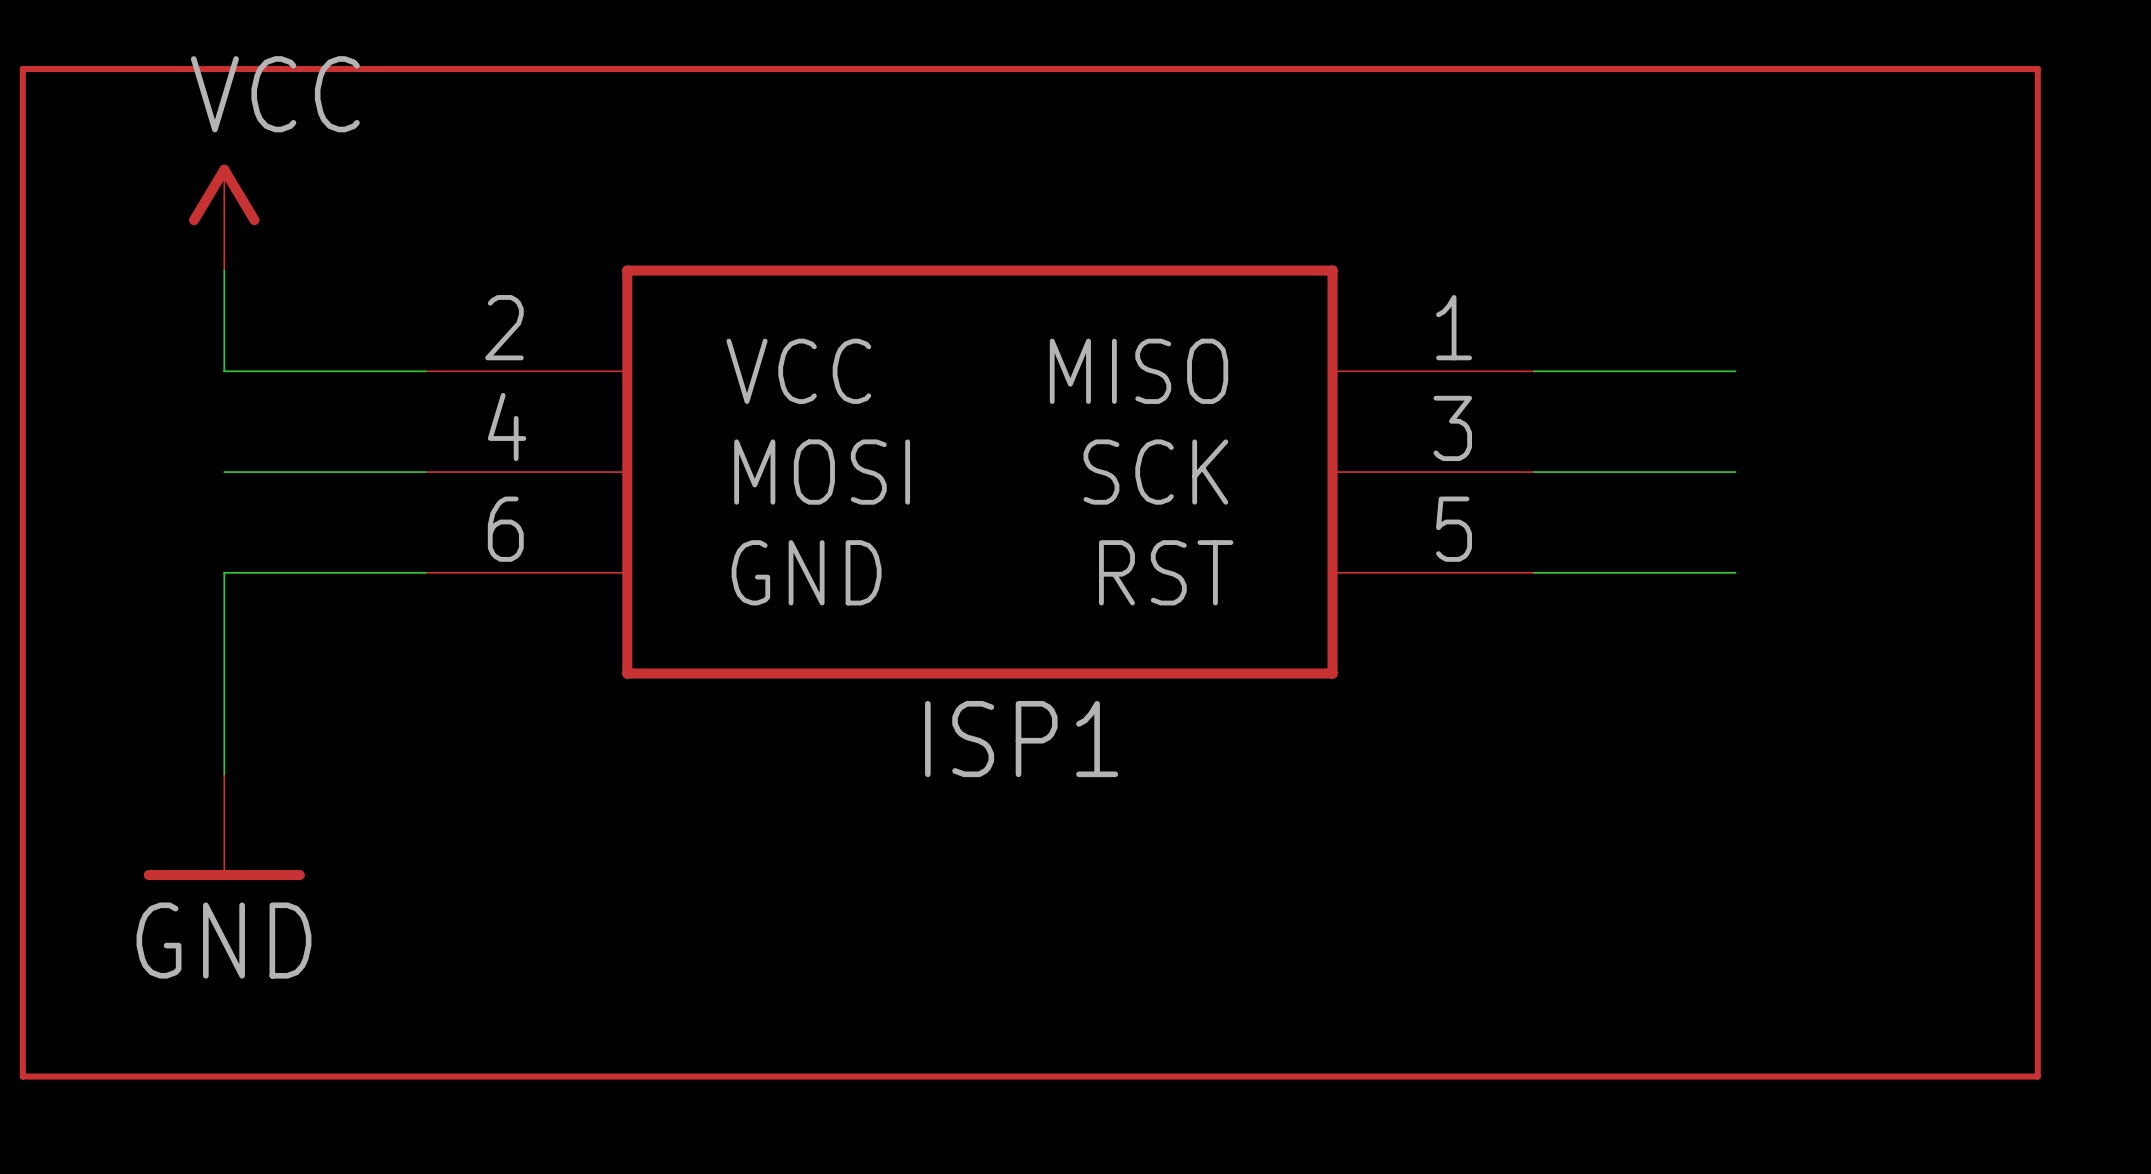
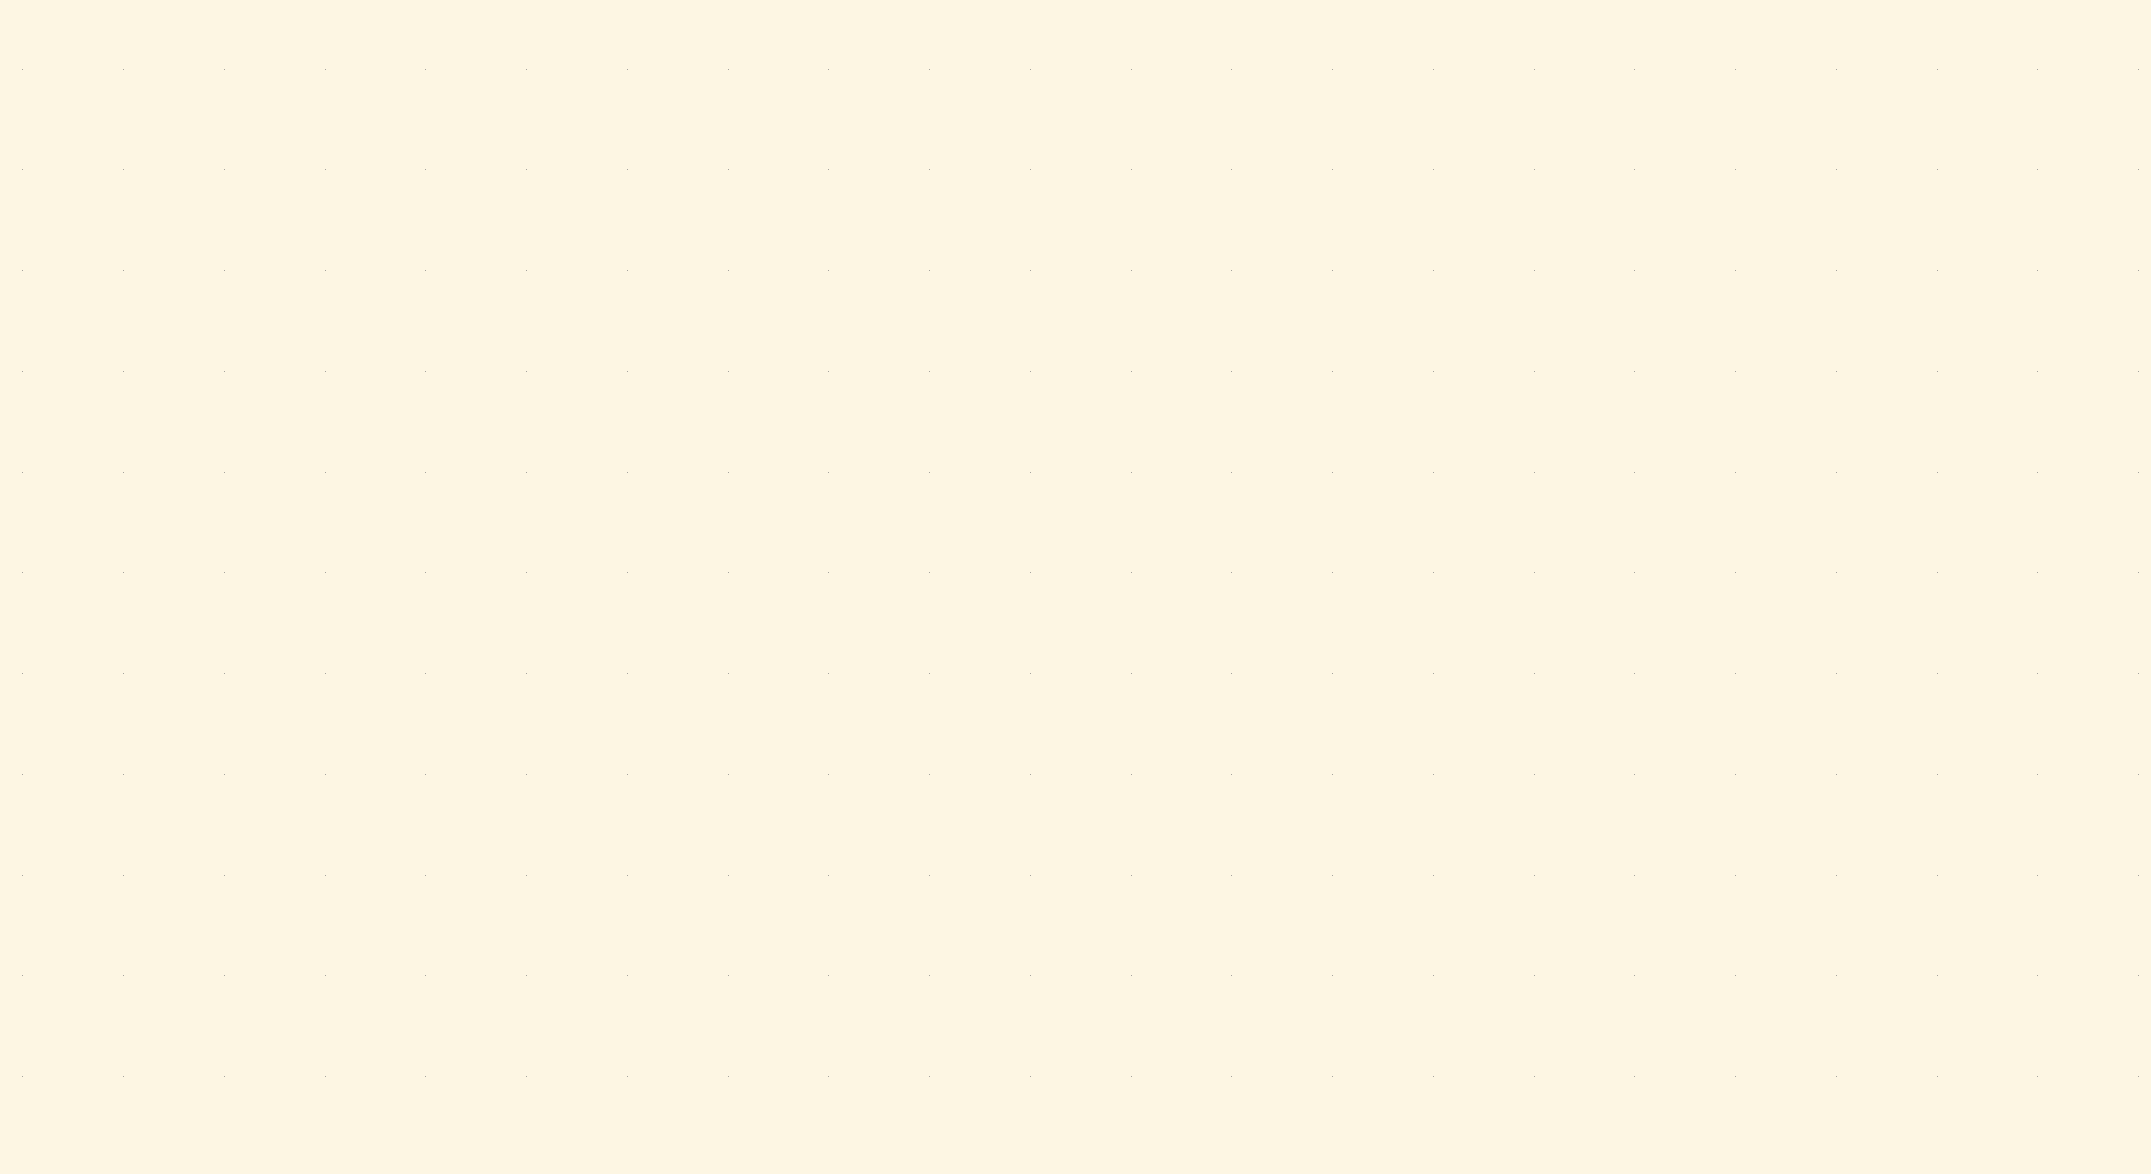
line: (22, 69) (22, 1076) (2037, 1076) (2037, 69) (22, 69) -> none
power symbol: VCC (224, 217) -> none
wire: (224, 270) (224, 371) (425, 371) -> none
wire: (1534, 371) (1735, 371) -> none
wire: (224, 472) (425, 472) -> none
ISP1: (979, 472) -> none
wire: (1534, 472) (1735, 472) -> none
wire: (425, 572) (224, 572) (224, 774) -> none
wire: (1534, 572) (1735, 572) -> none
power symbol: GND (224, 827) -> none

